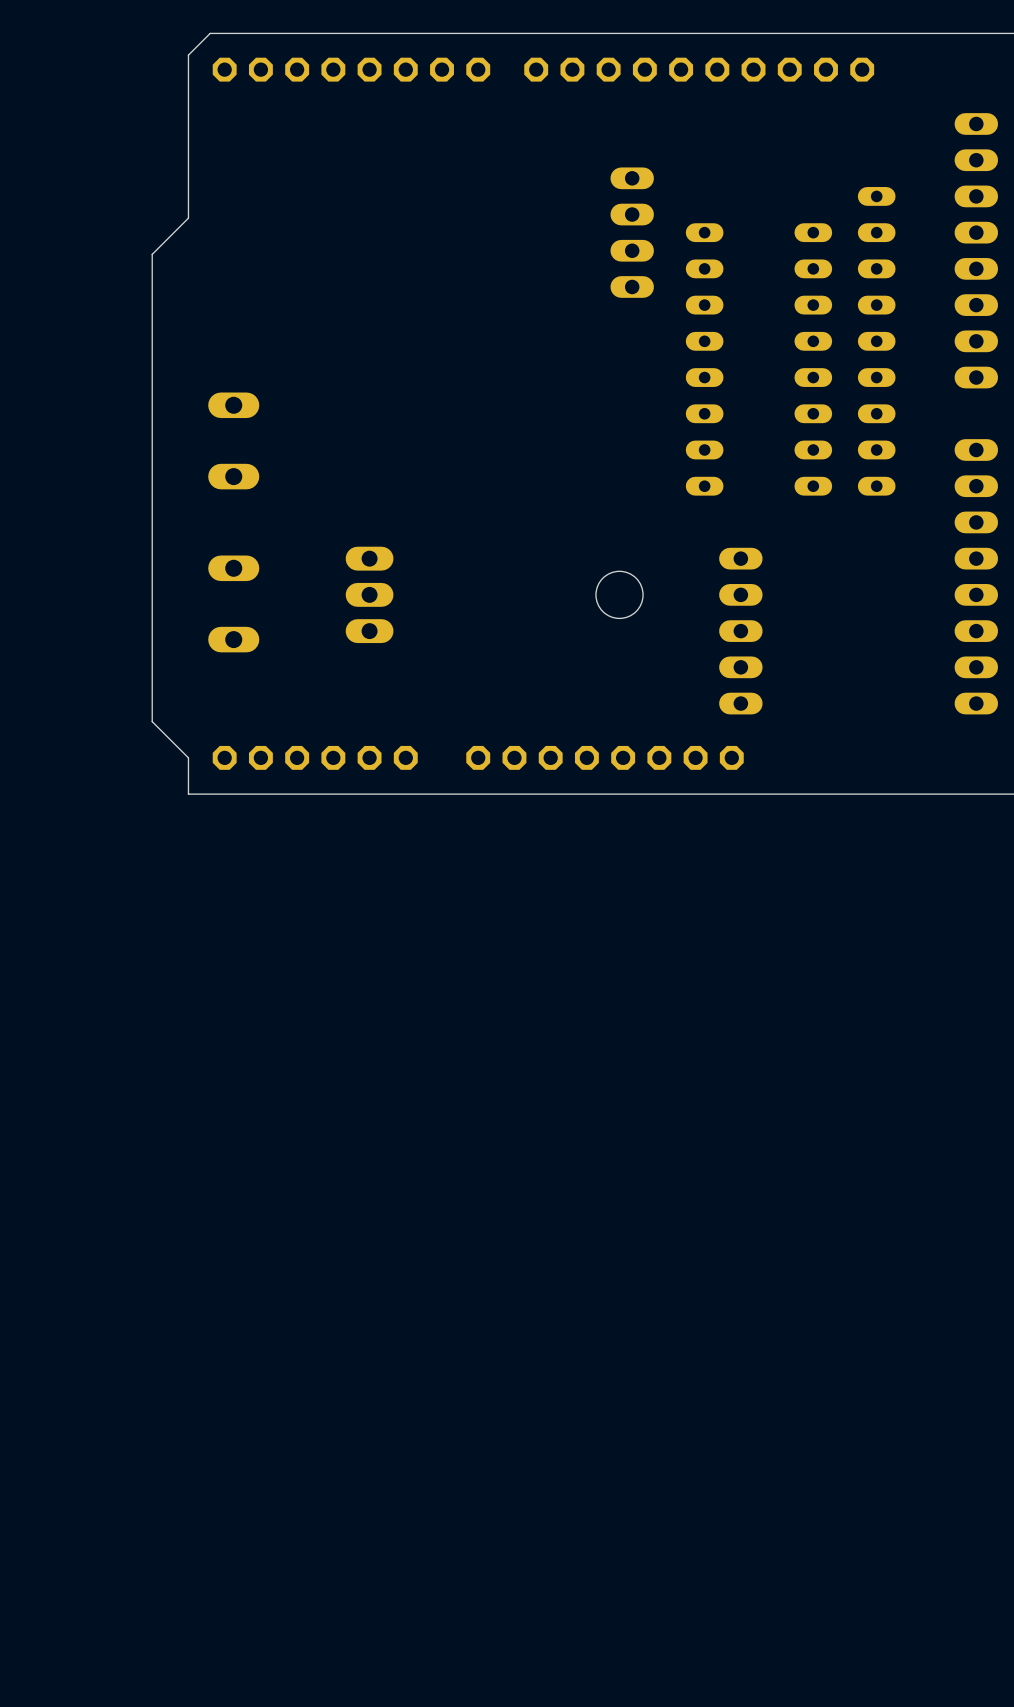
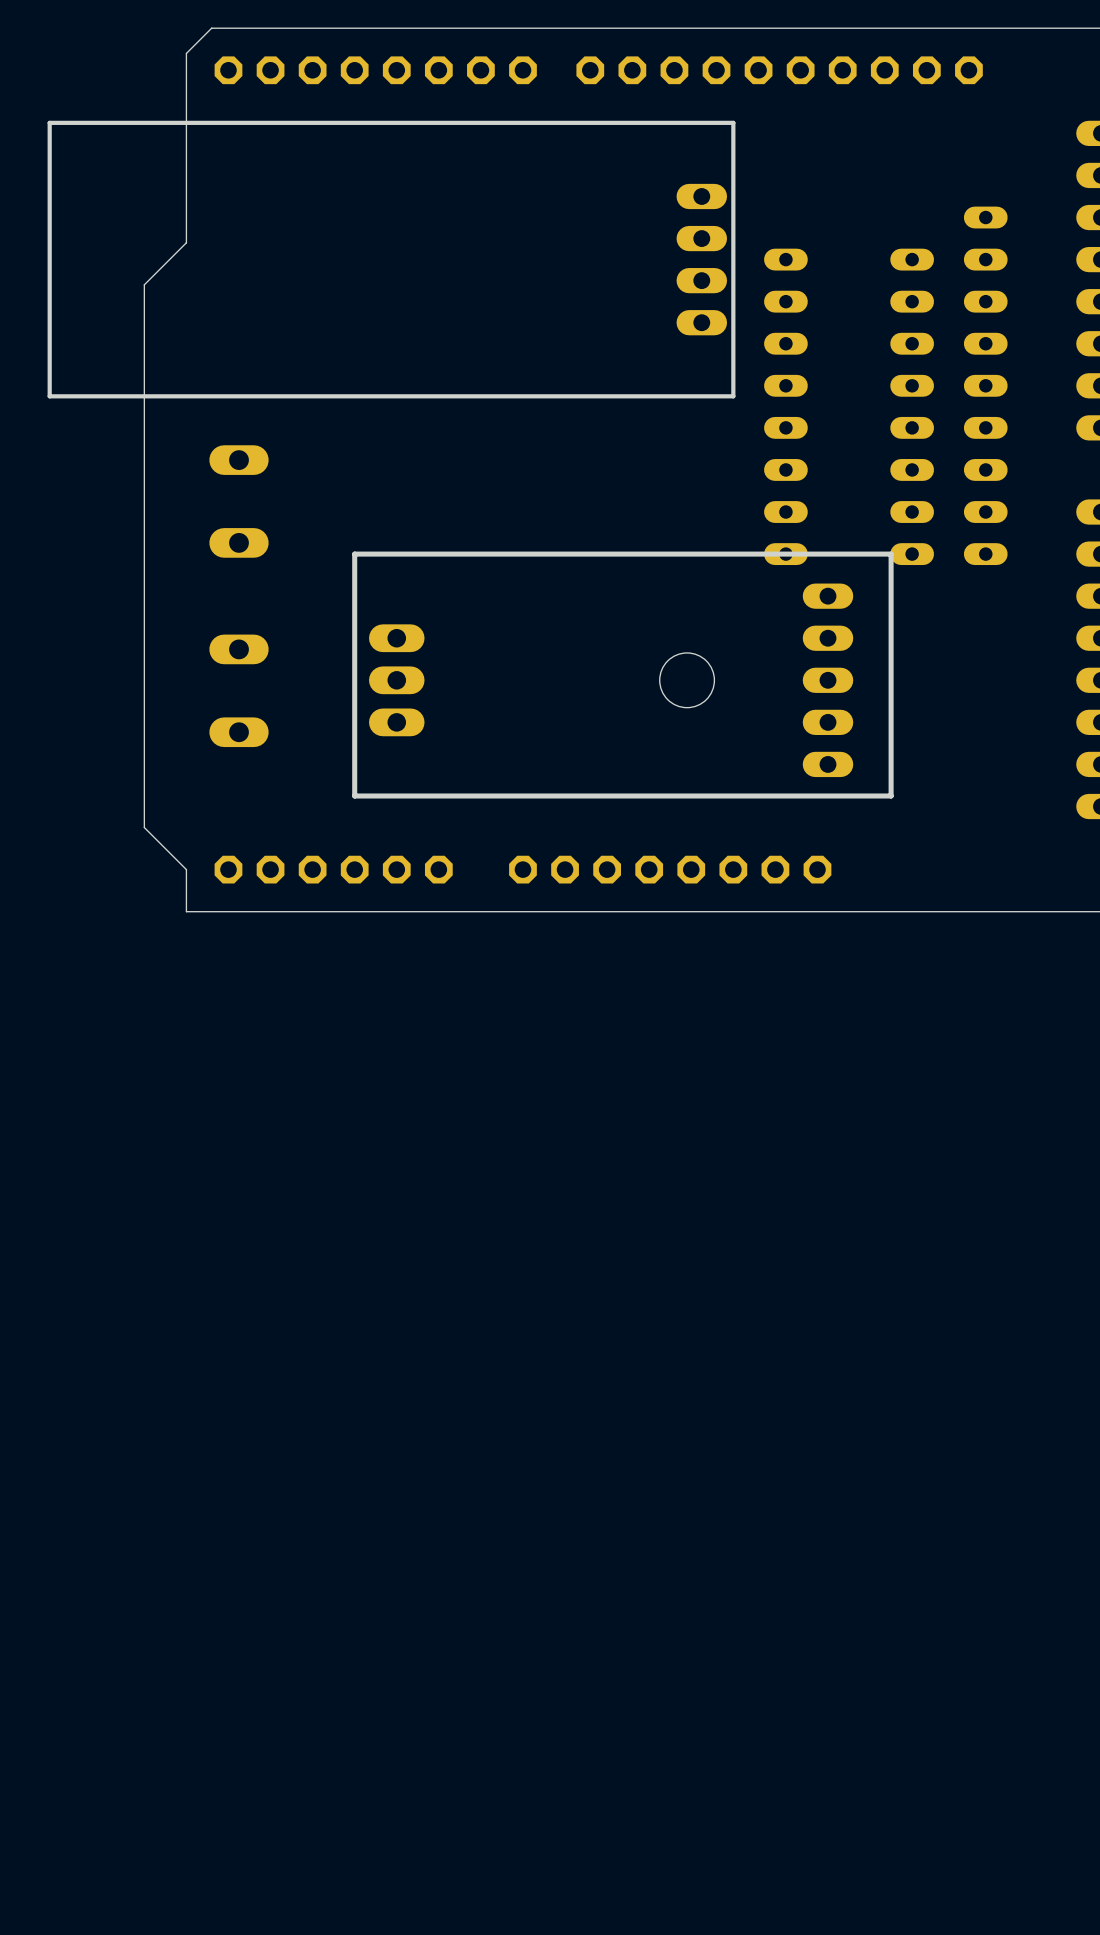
board edge: none -> (733, 122) (733, 396) (49, 396) (49, 122) (733, 122)
board edge: none -> (891, 554) (354, 554) (354, 795) (891, 795) (891, 554)
part position: (740, 631) -> (828, 680)

